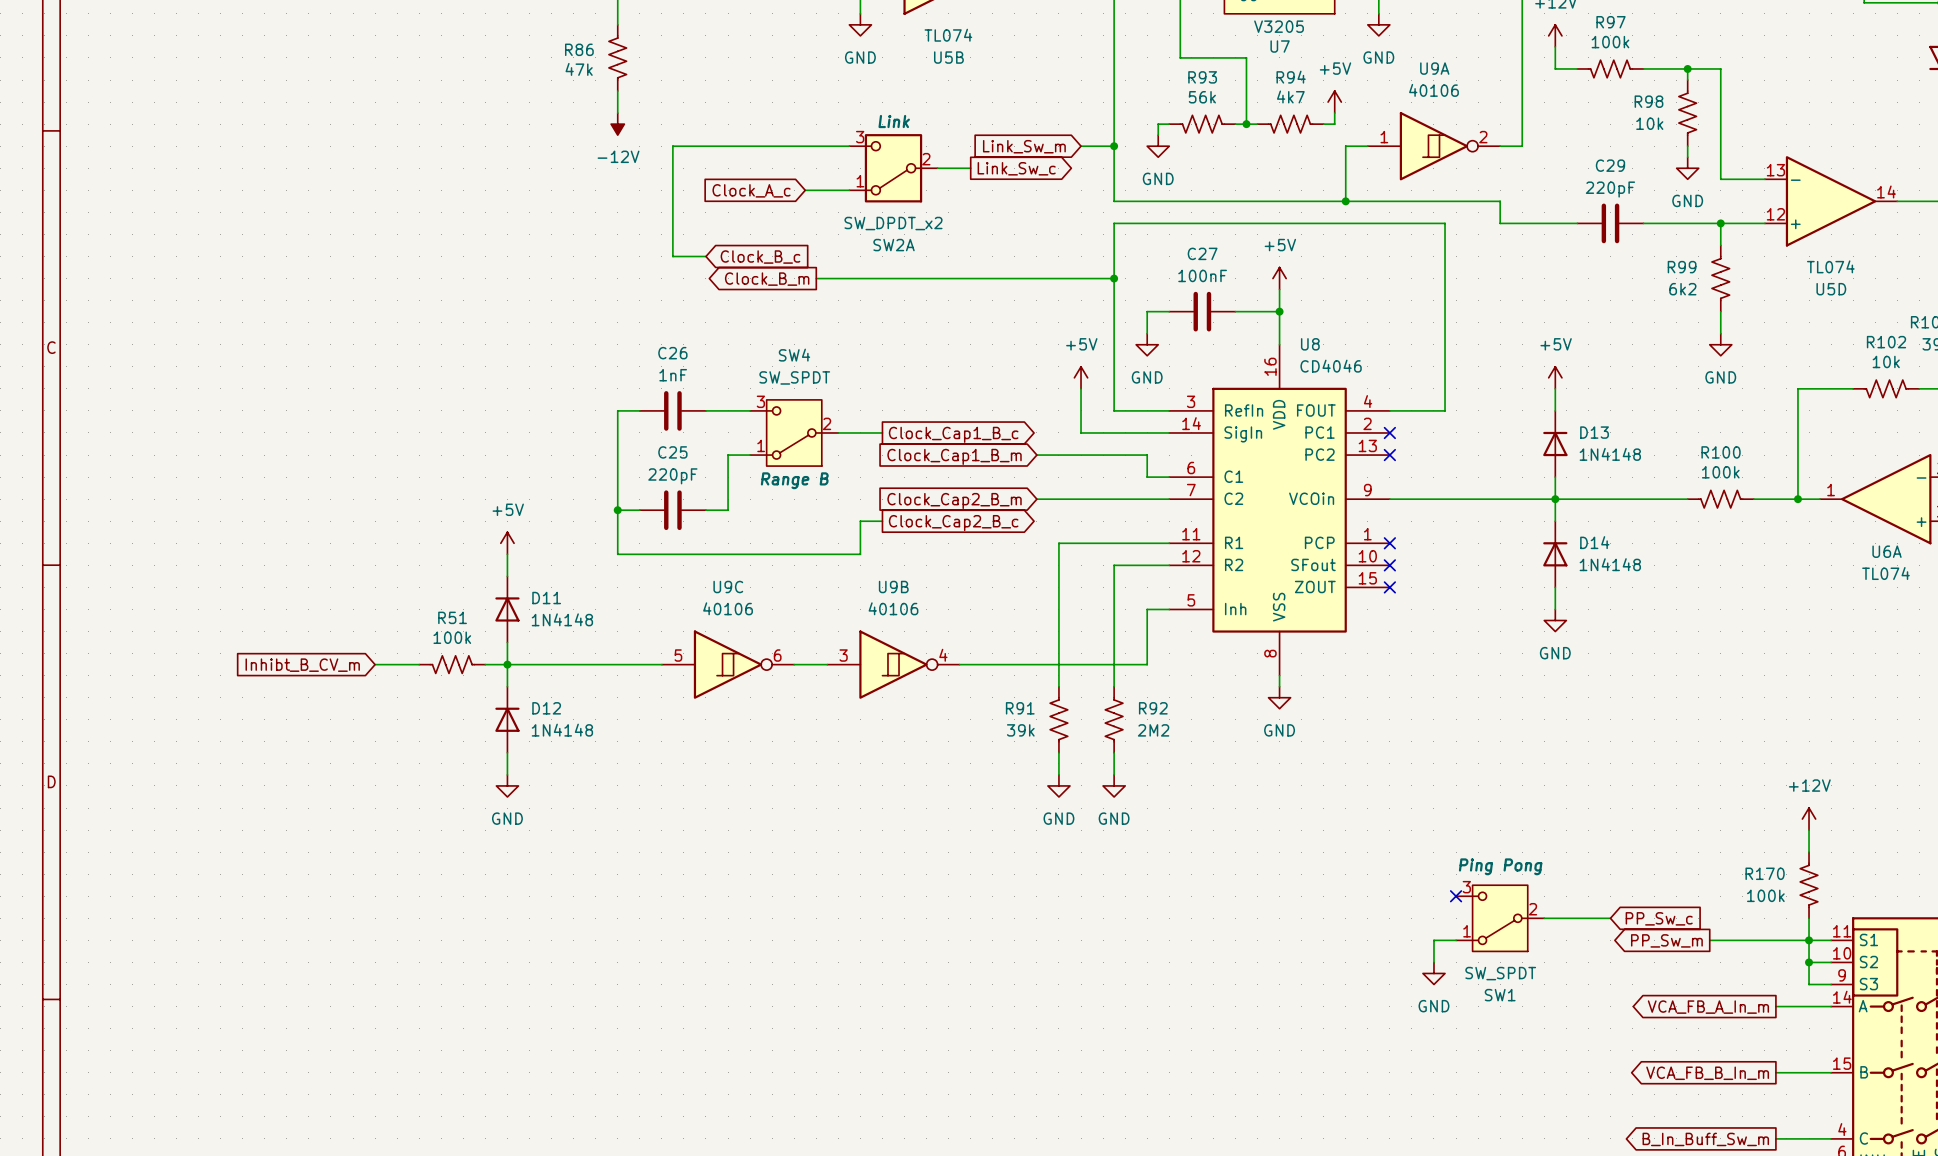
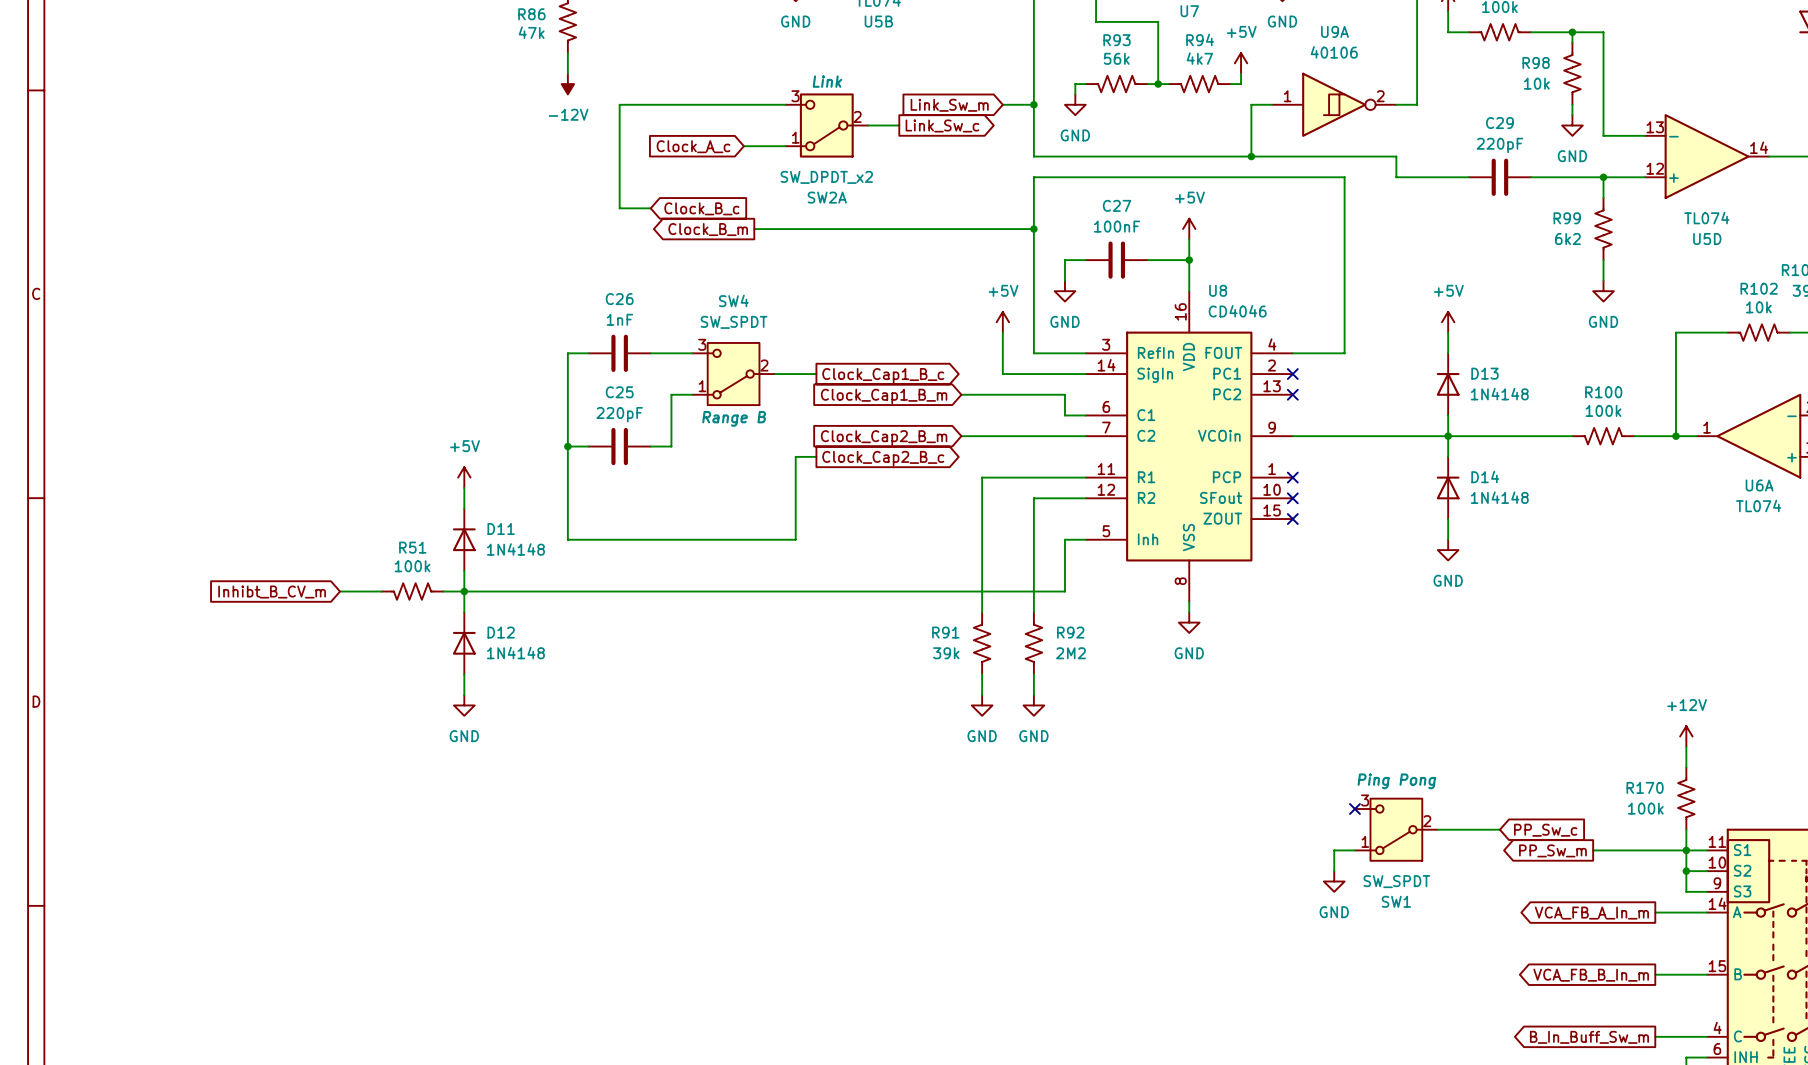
wire: (617, 554) (860, 554) -> (567, 487) (567, 539) (795, 539) (795, 487)
U9C: 40106 (728, 664) -> none
U9B: 40106 (893, 664) -> none

